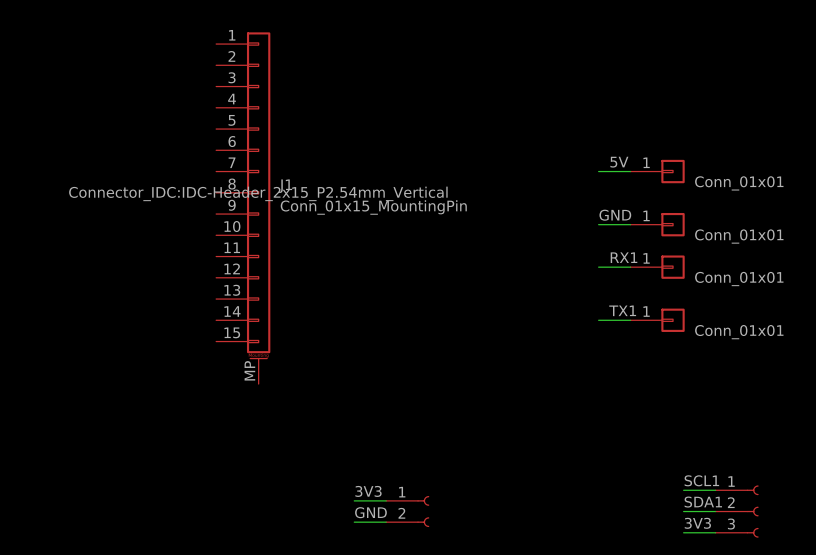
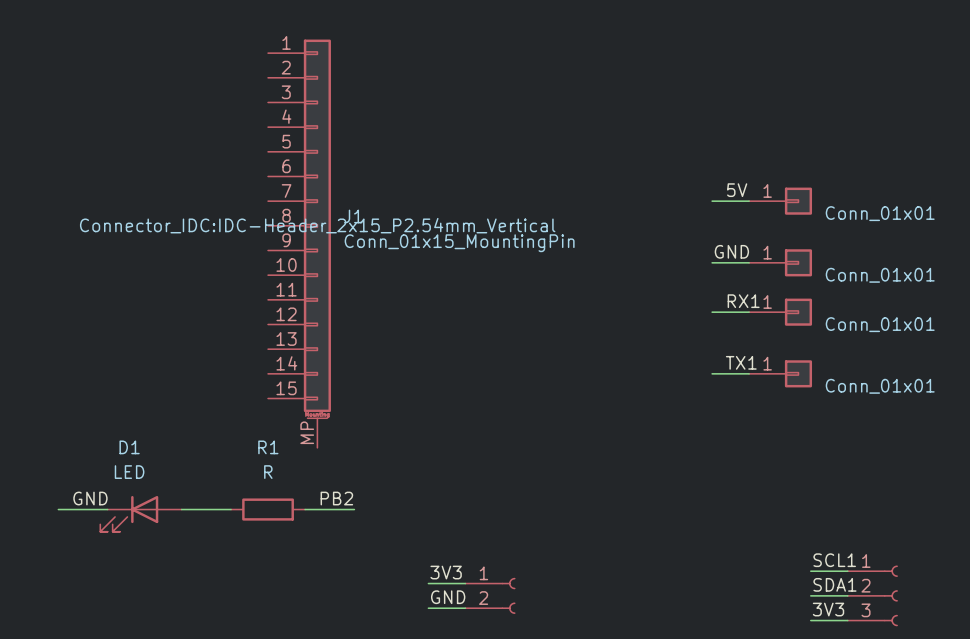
label: none -> GND (90, 498)
label: none -> PB2 (336, 498)
wire: none -> (58, 509) (107, 509)
wire: none -> (181, 509) (231, 509)
R1: none -> R (268, 509)
wire: none -> (305, 509) (354, 509)
D1: none -> LED (141, 513)

